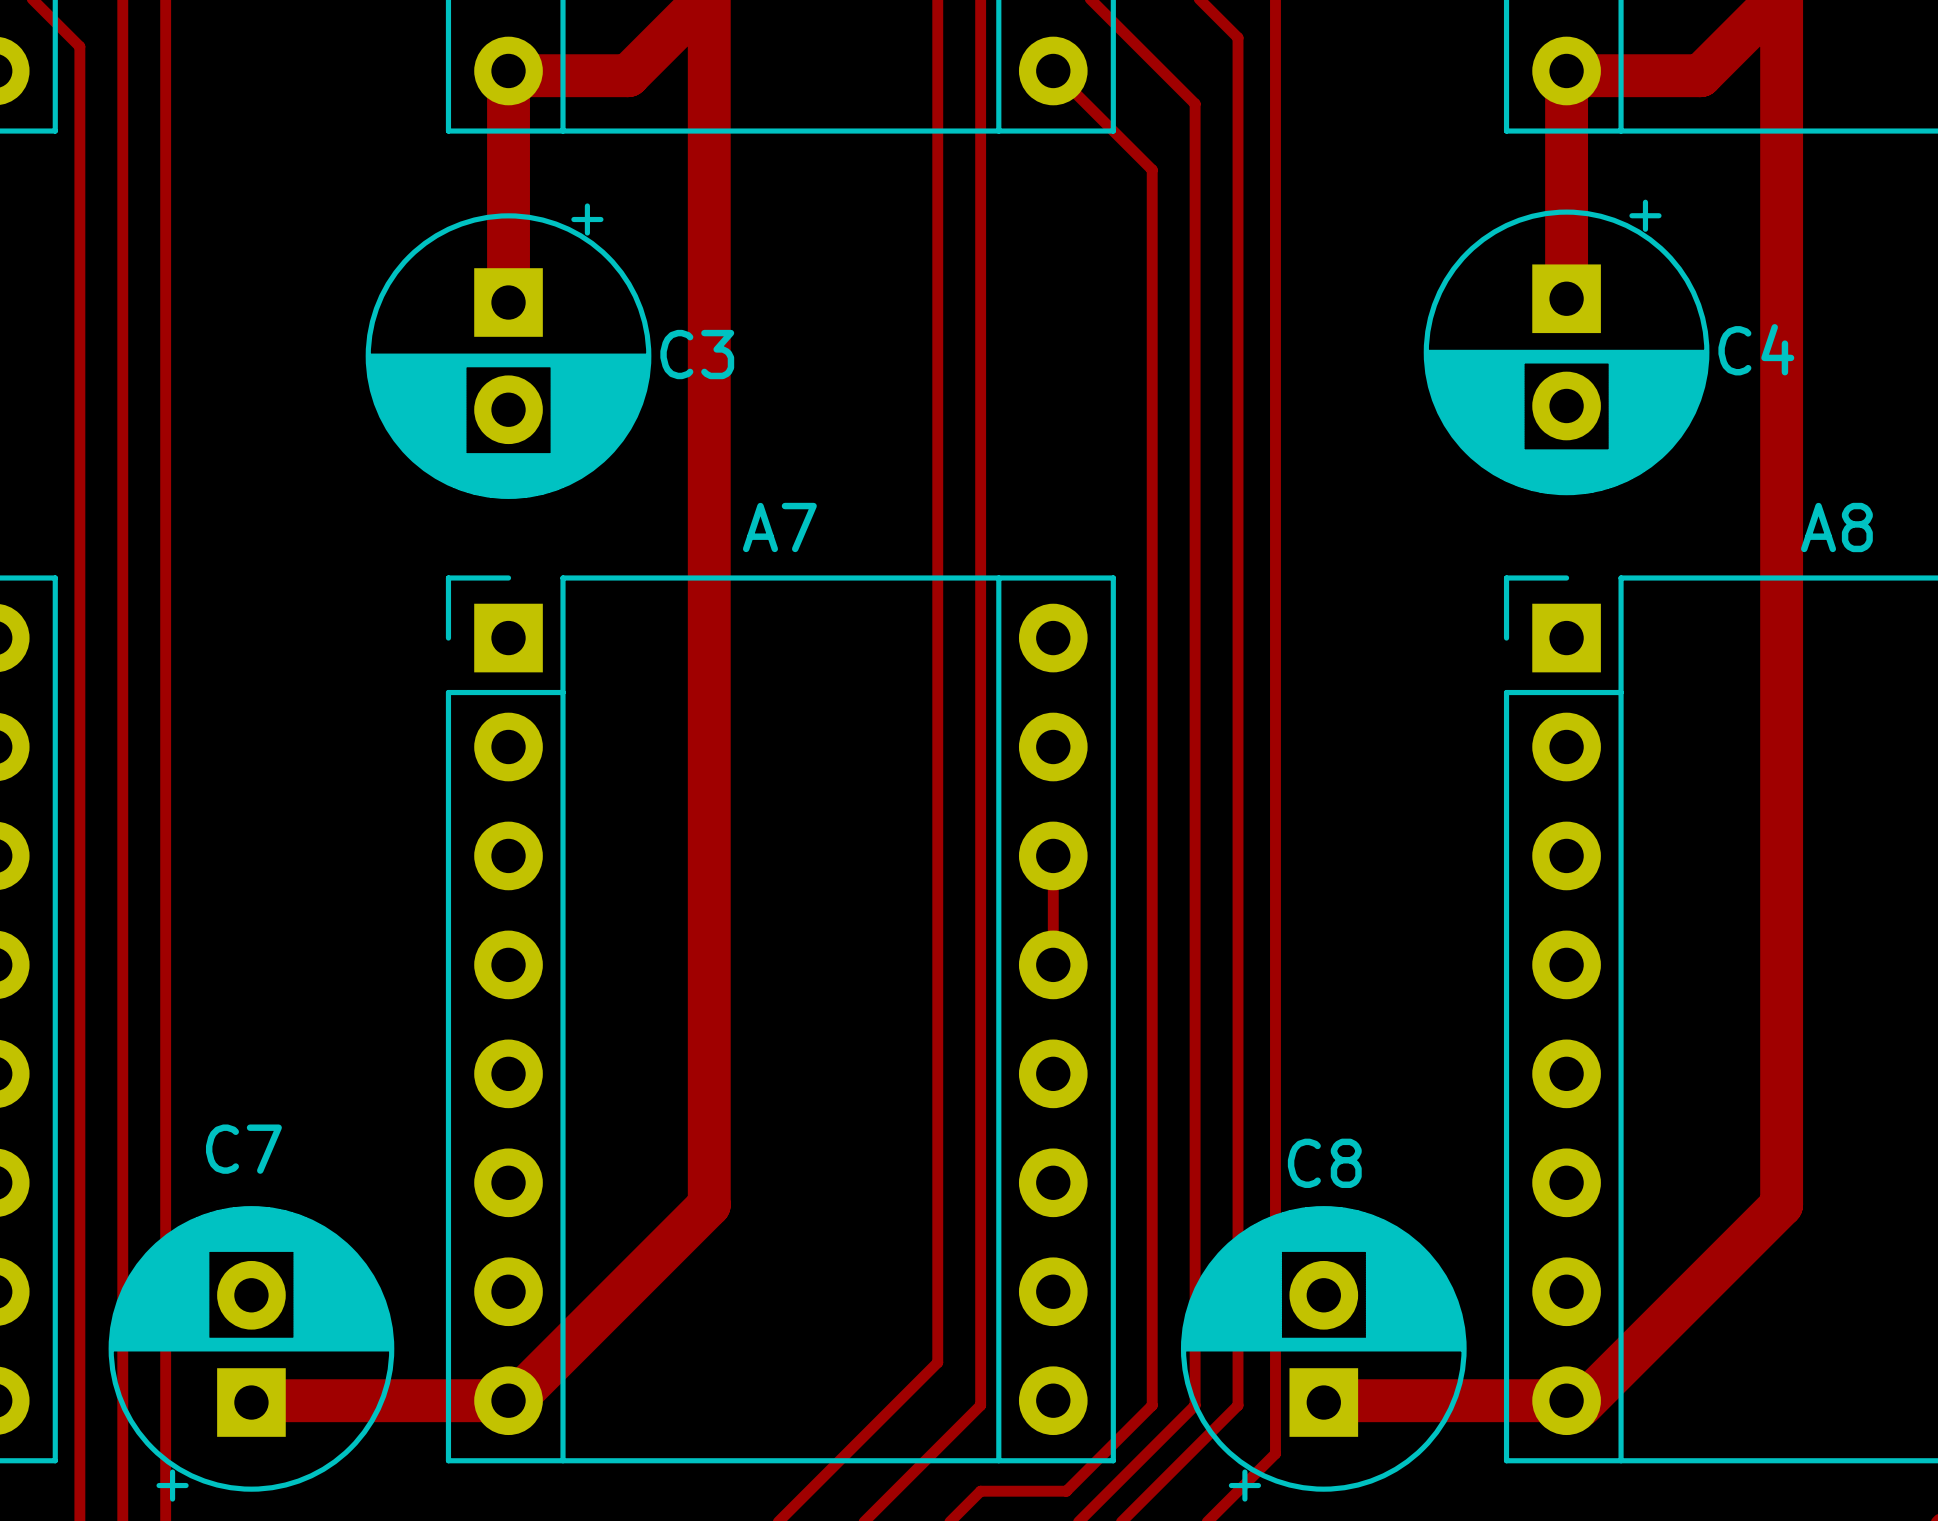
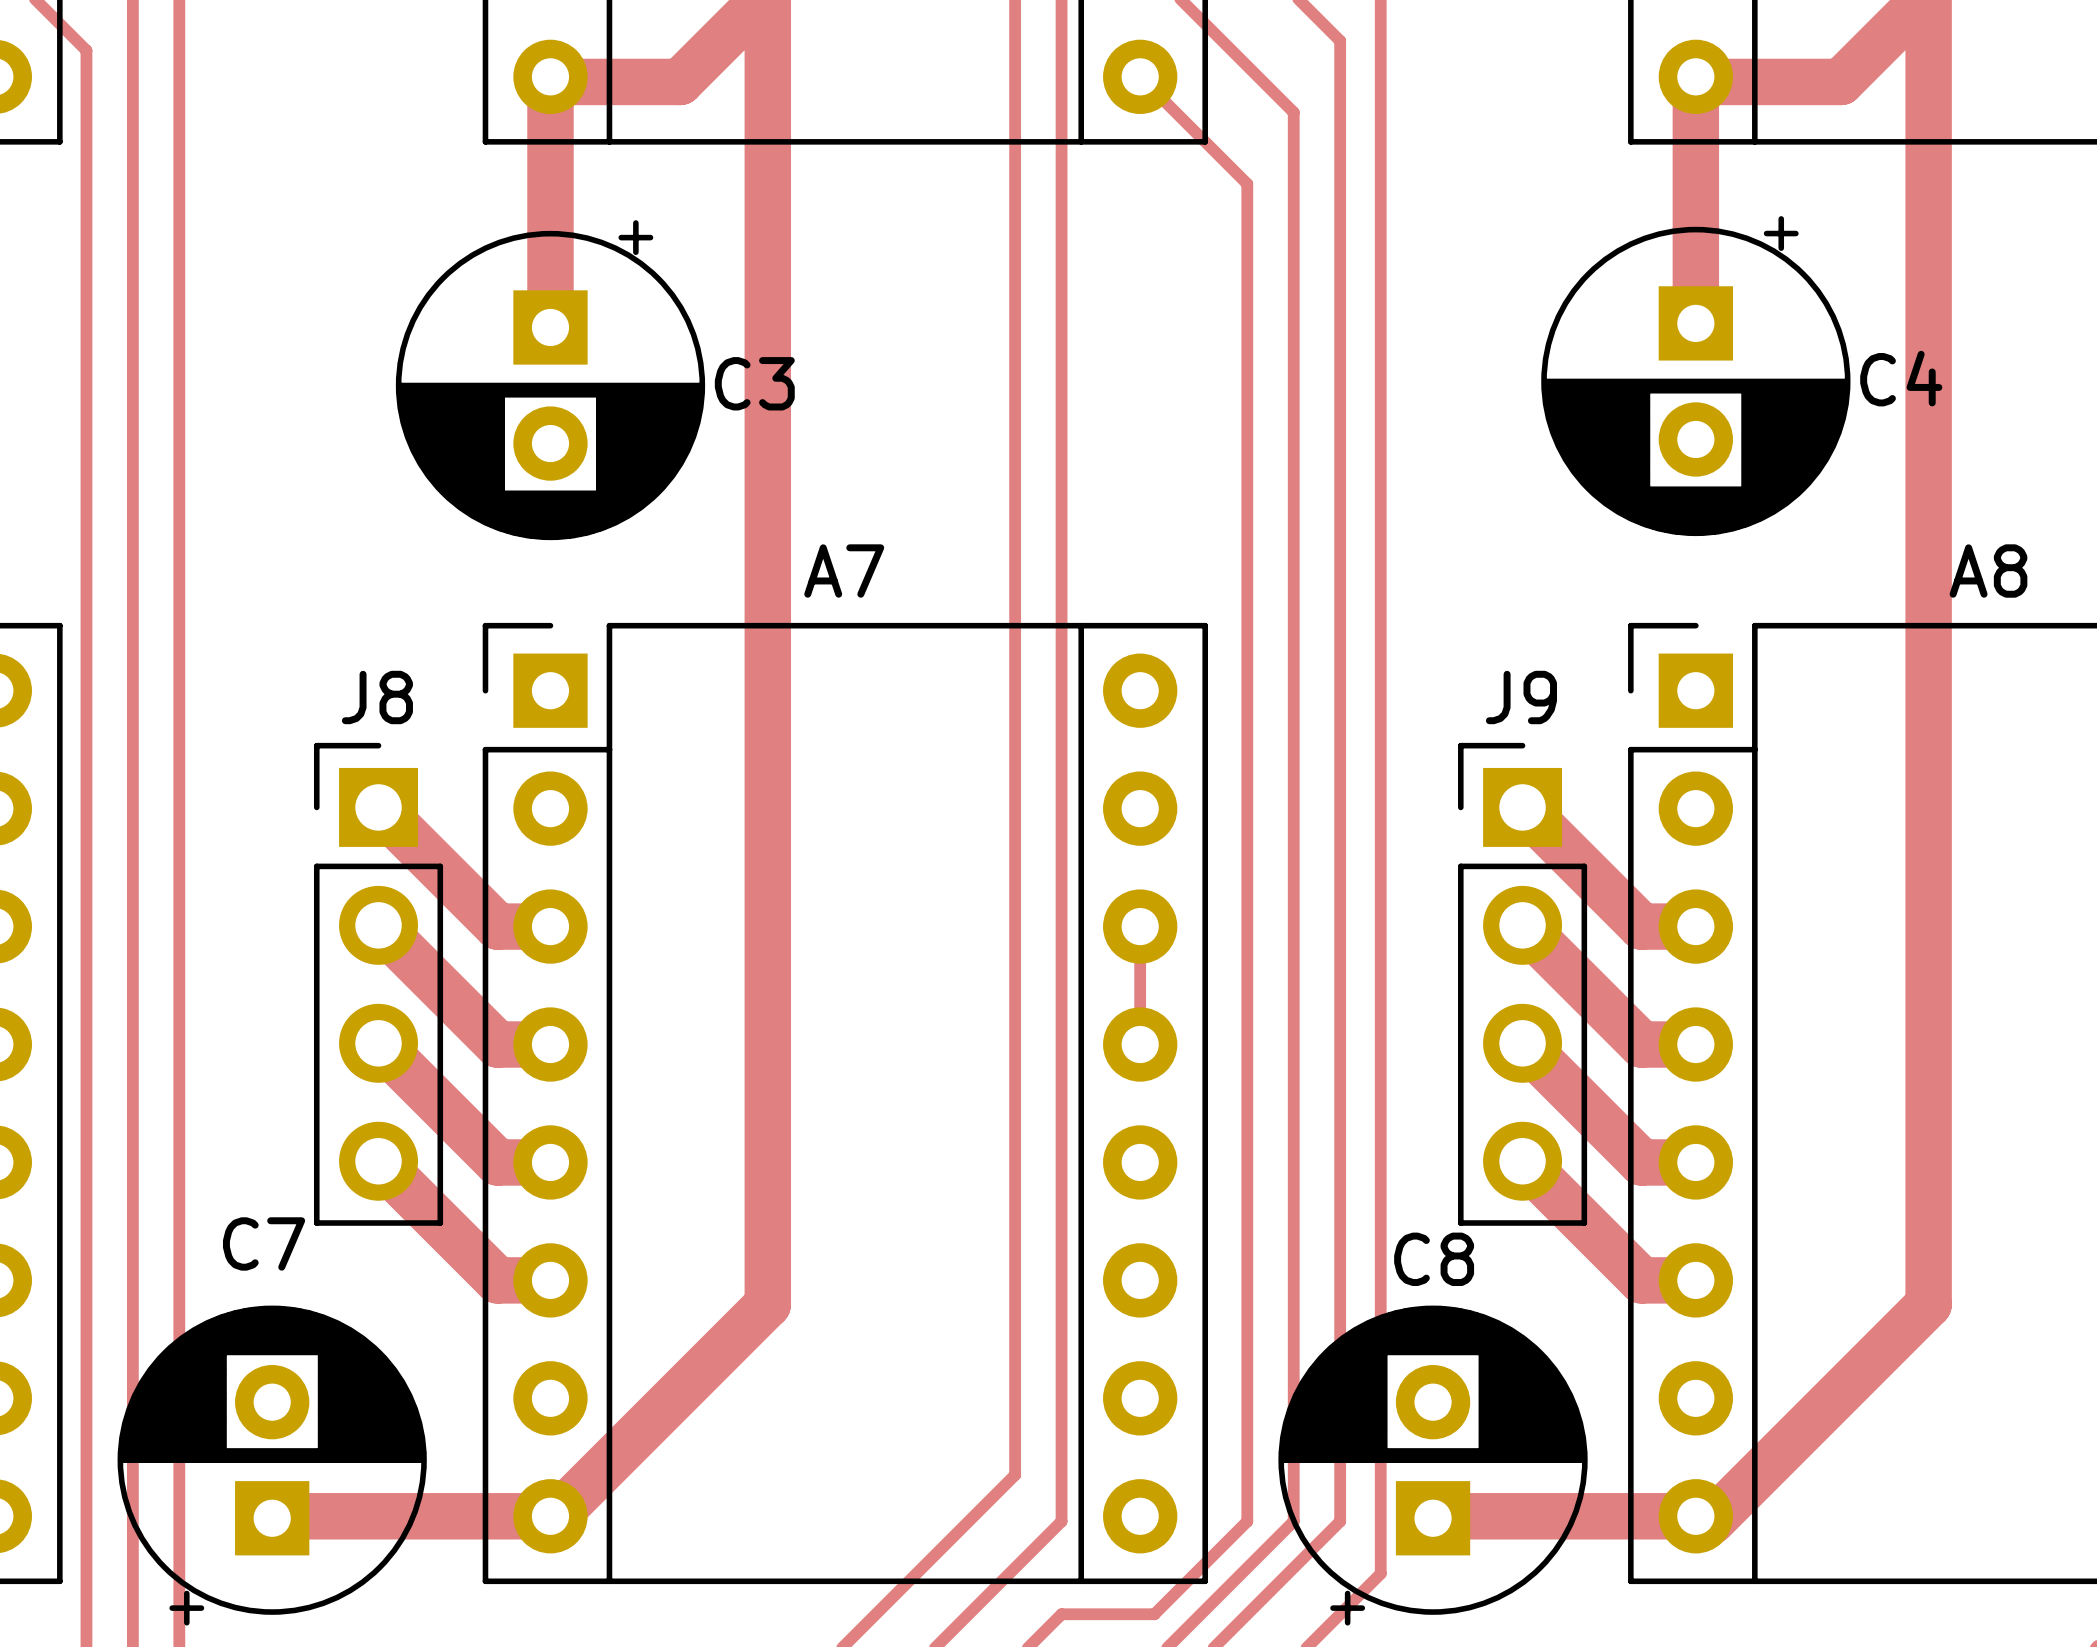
track: none -> (378, 807) (497, 926) (550, 926)
track: none -> (1522, 807) (1641, 926) (1695, 926)
track: none -> (378, 925) (497, 1044) (550, 1044)
track: none -> (1522, 925) (1641, 1044) (1695, 1044)
J8: none -> (378, 984)
J9: none -> (1522, 984)
track: none -> (378, 1043) (497, 1162) (550, 1162)
track: none -> (1522, 1043) (1641, 1162) (1695, 1162)
track: none -> (378, 1161) (497, 1280) (550, 1280)
track: none -> (1522, 1161) (1641, 1280) (1695, 1280)

